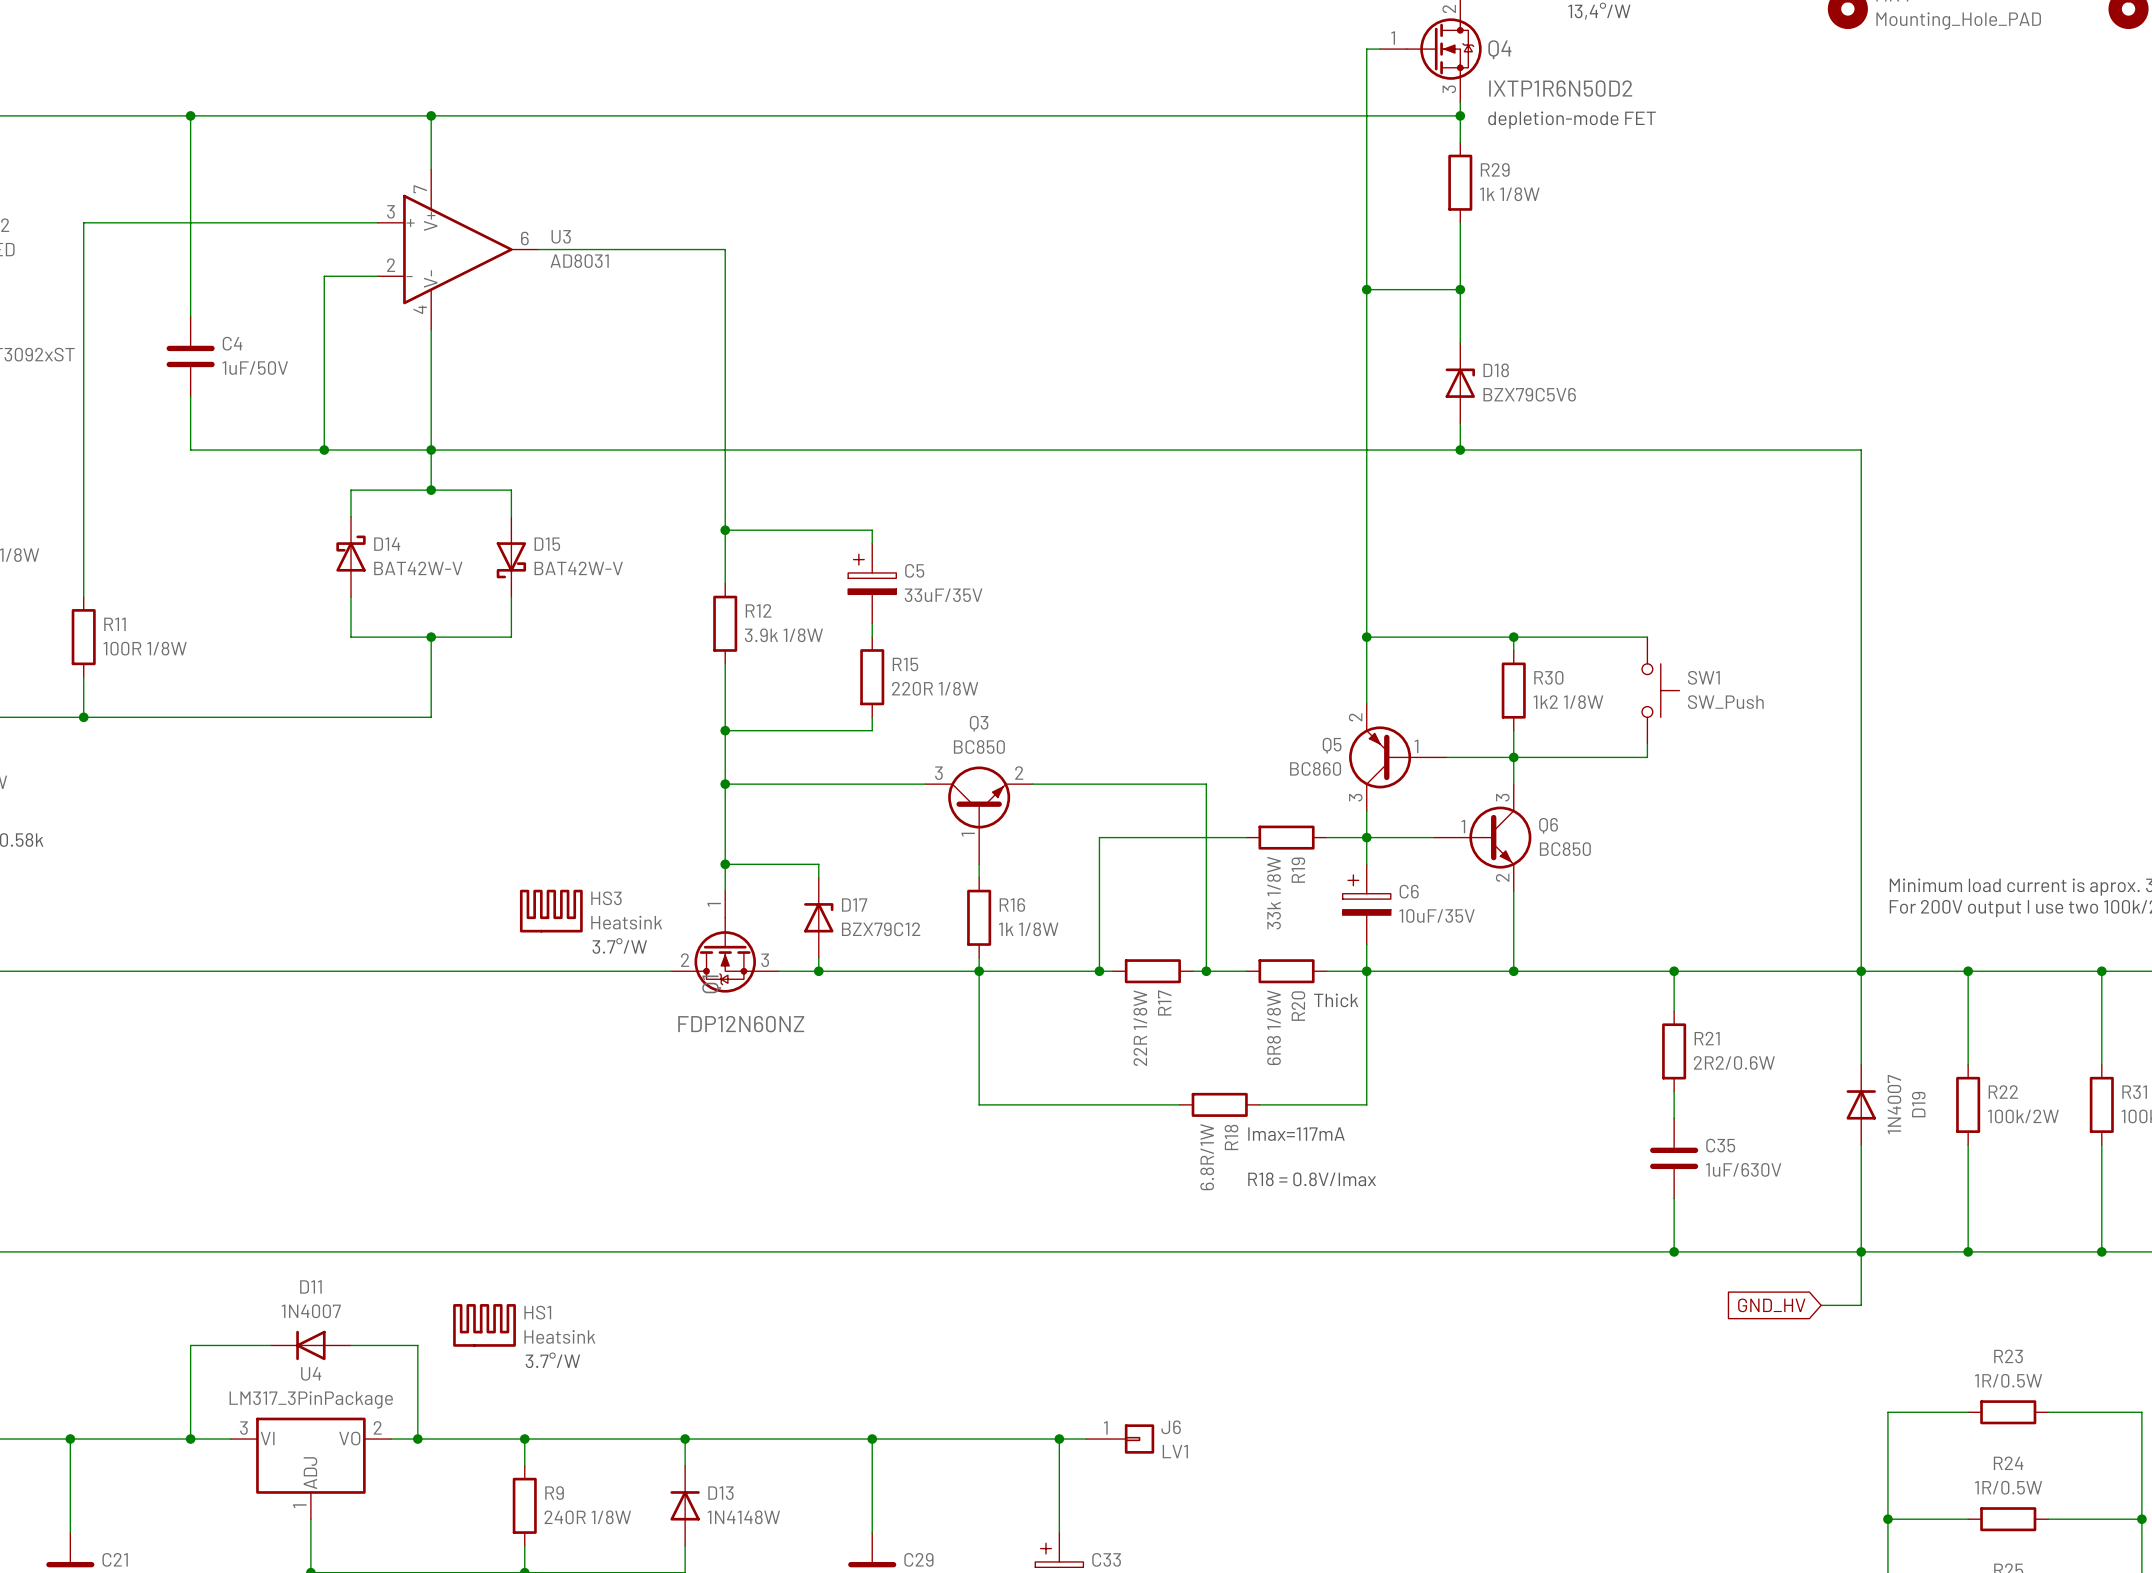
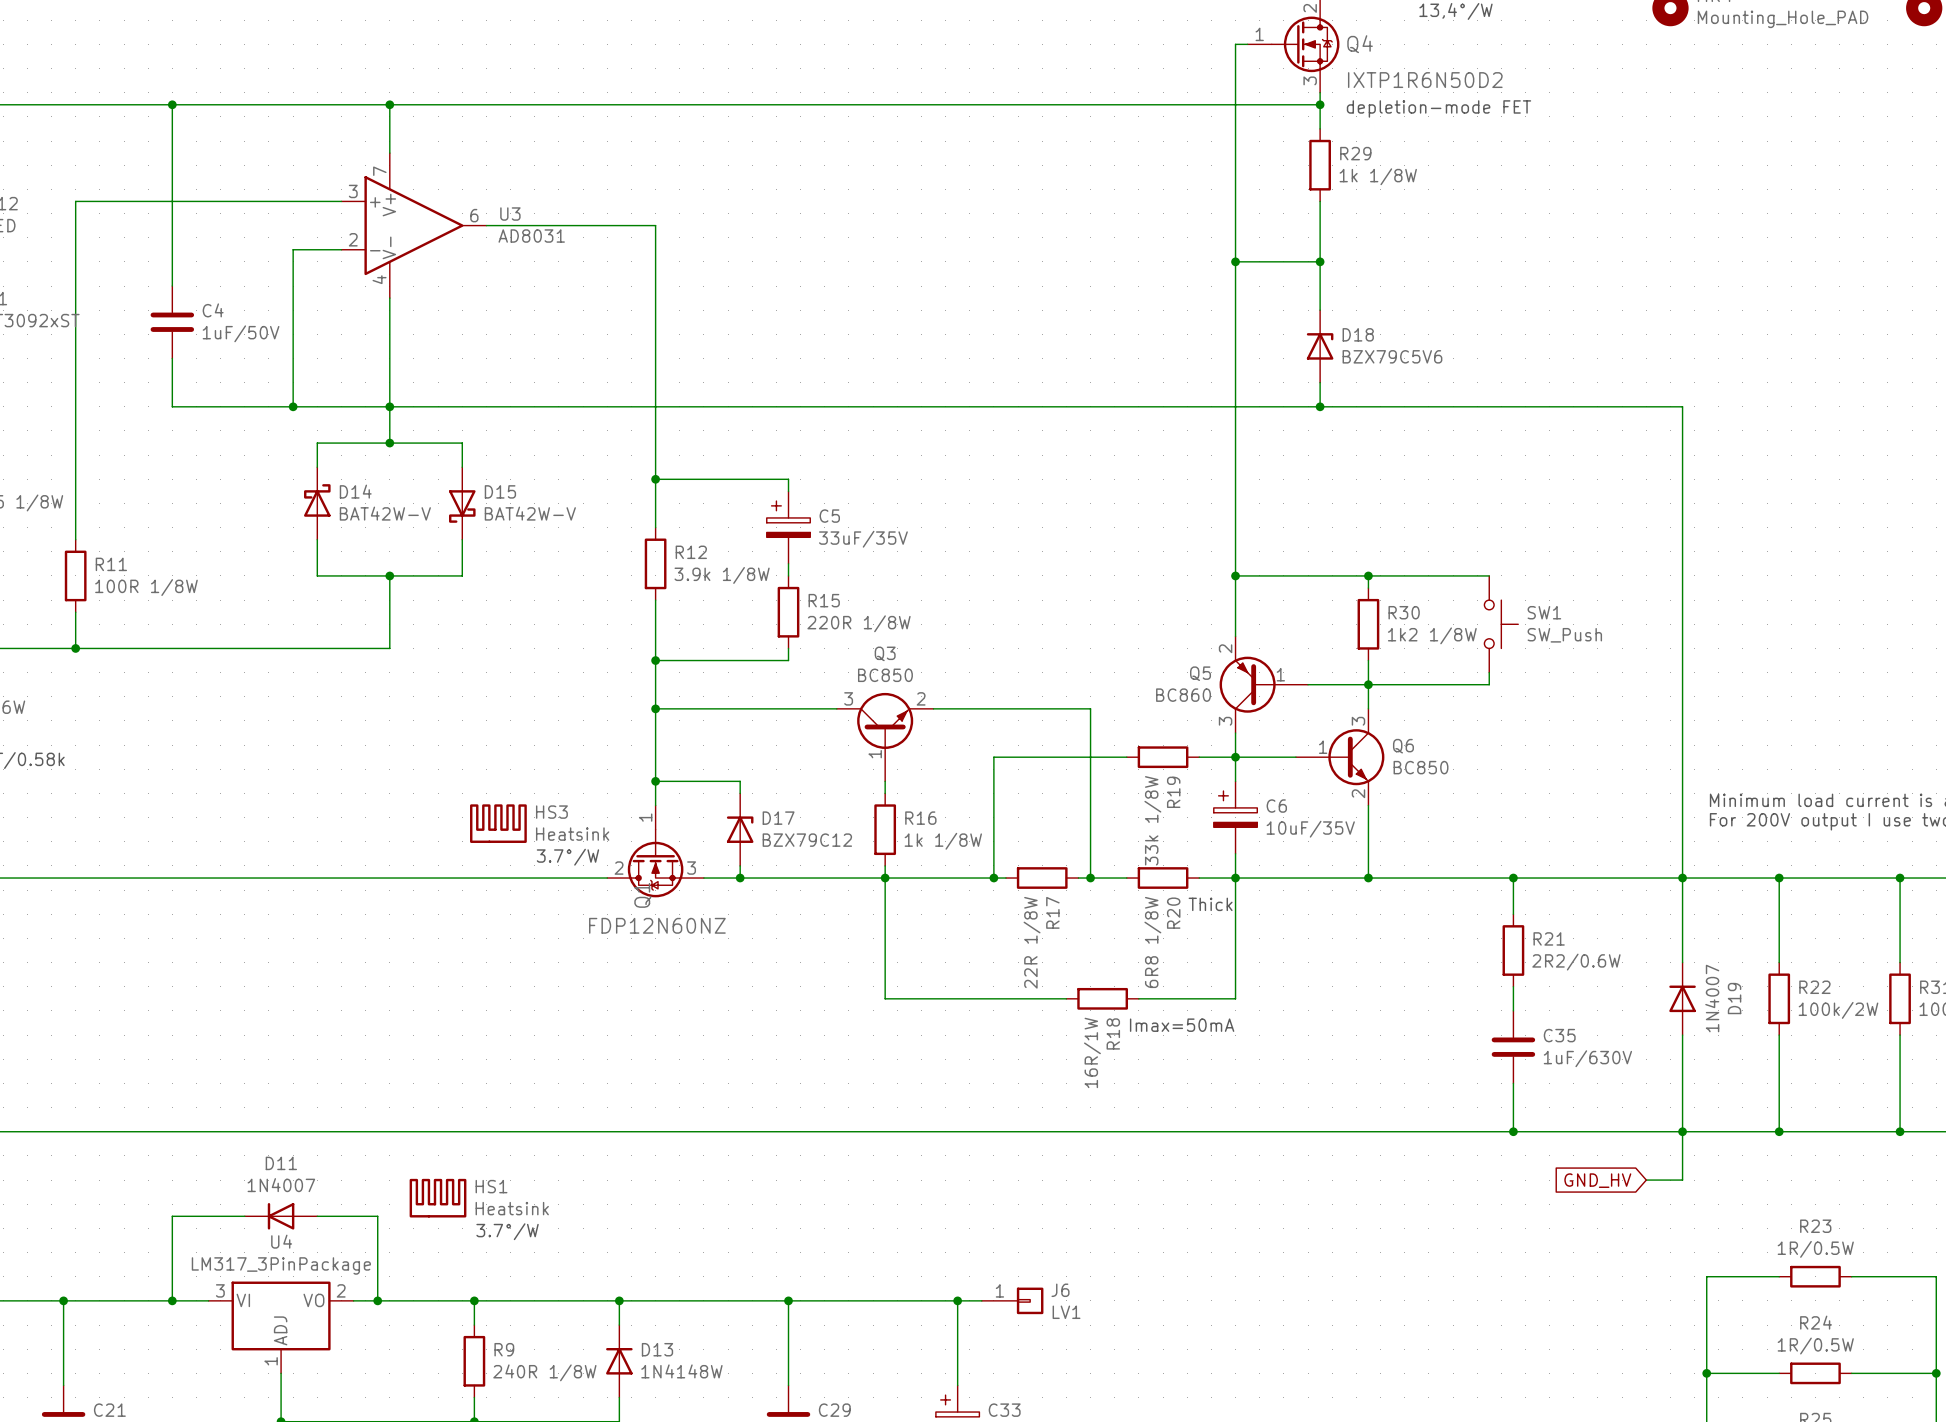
text: Imax=117mA (1296, 1134) -> Imax=50mA (1182, 1025)
R18 value: 6.8R/1W (1207, 1157) -> 16R/1W (1092, 1052)
text: R18 = 0.8V/Imax (1312, 1179) -> none

